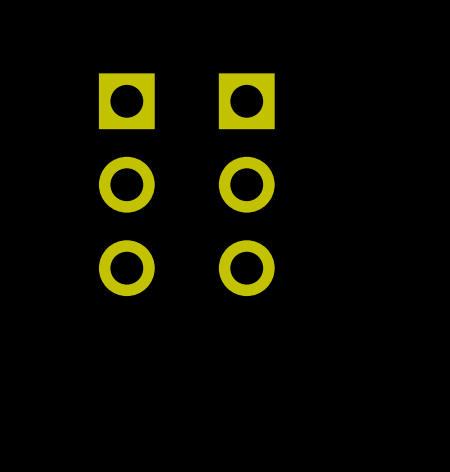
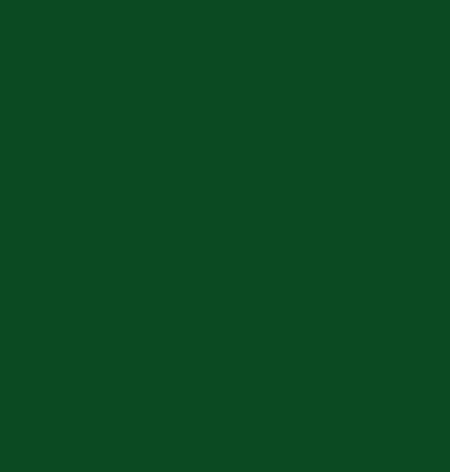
part: (126, 184) -> none
part: (246, 184) -> none

